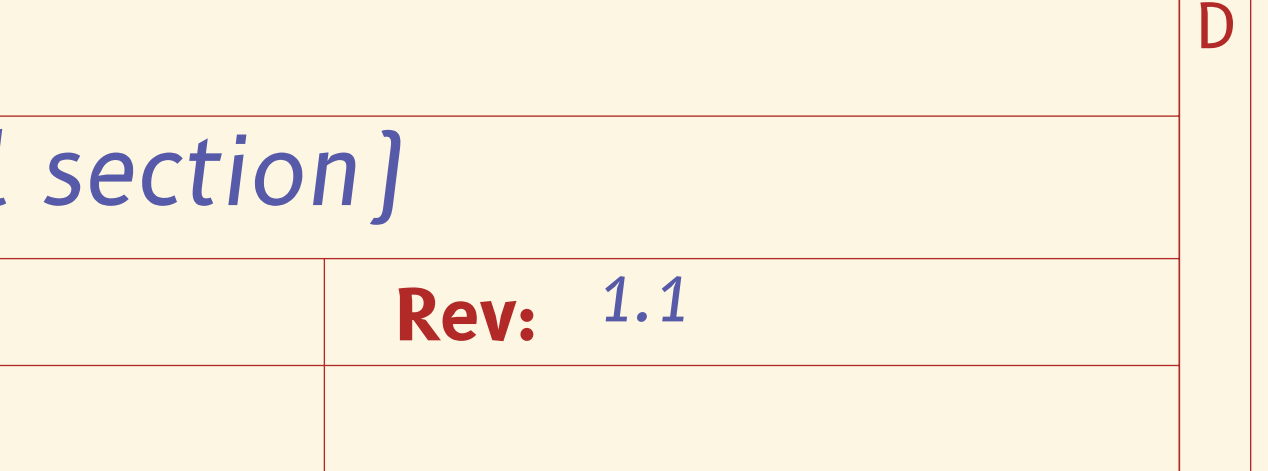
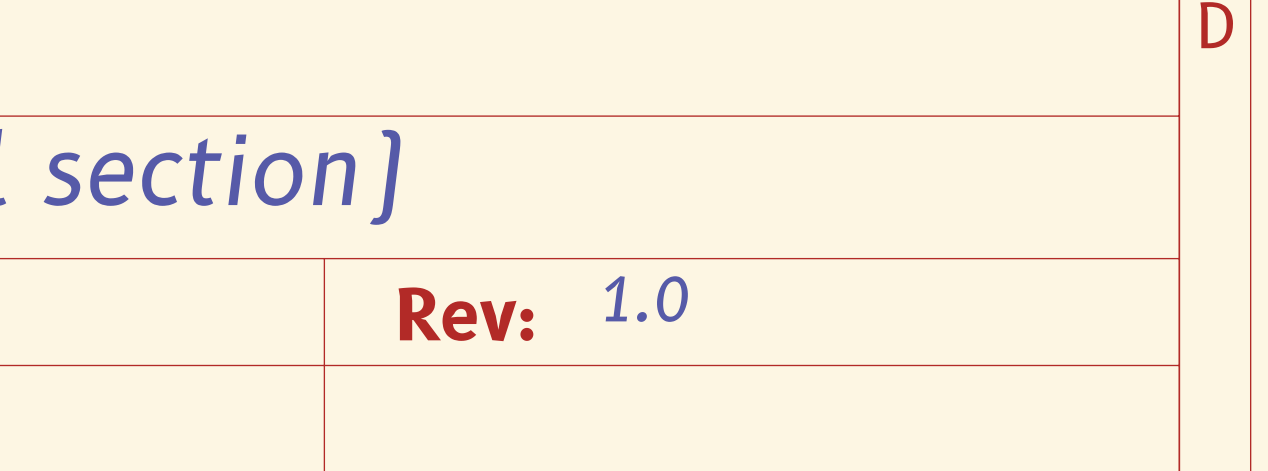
text: 1.1 (644, 299) -> 1.0 (646, 299)

